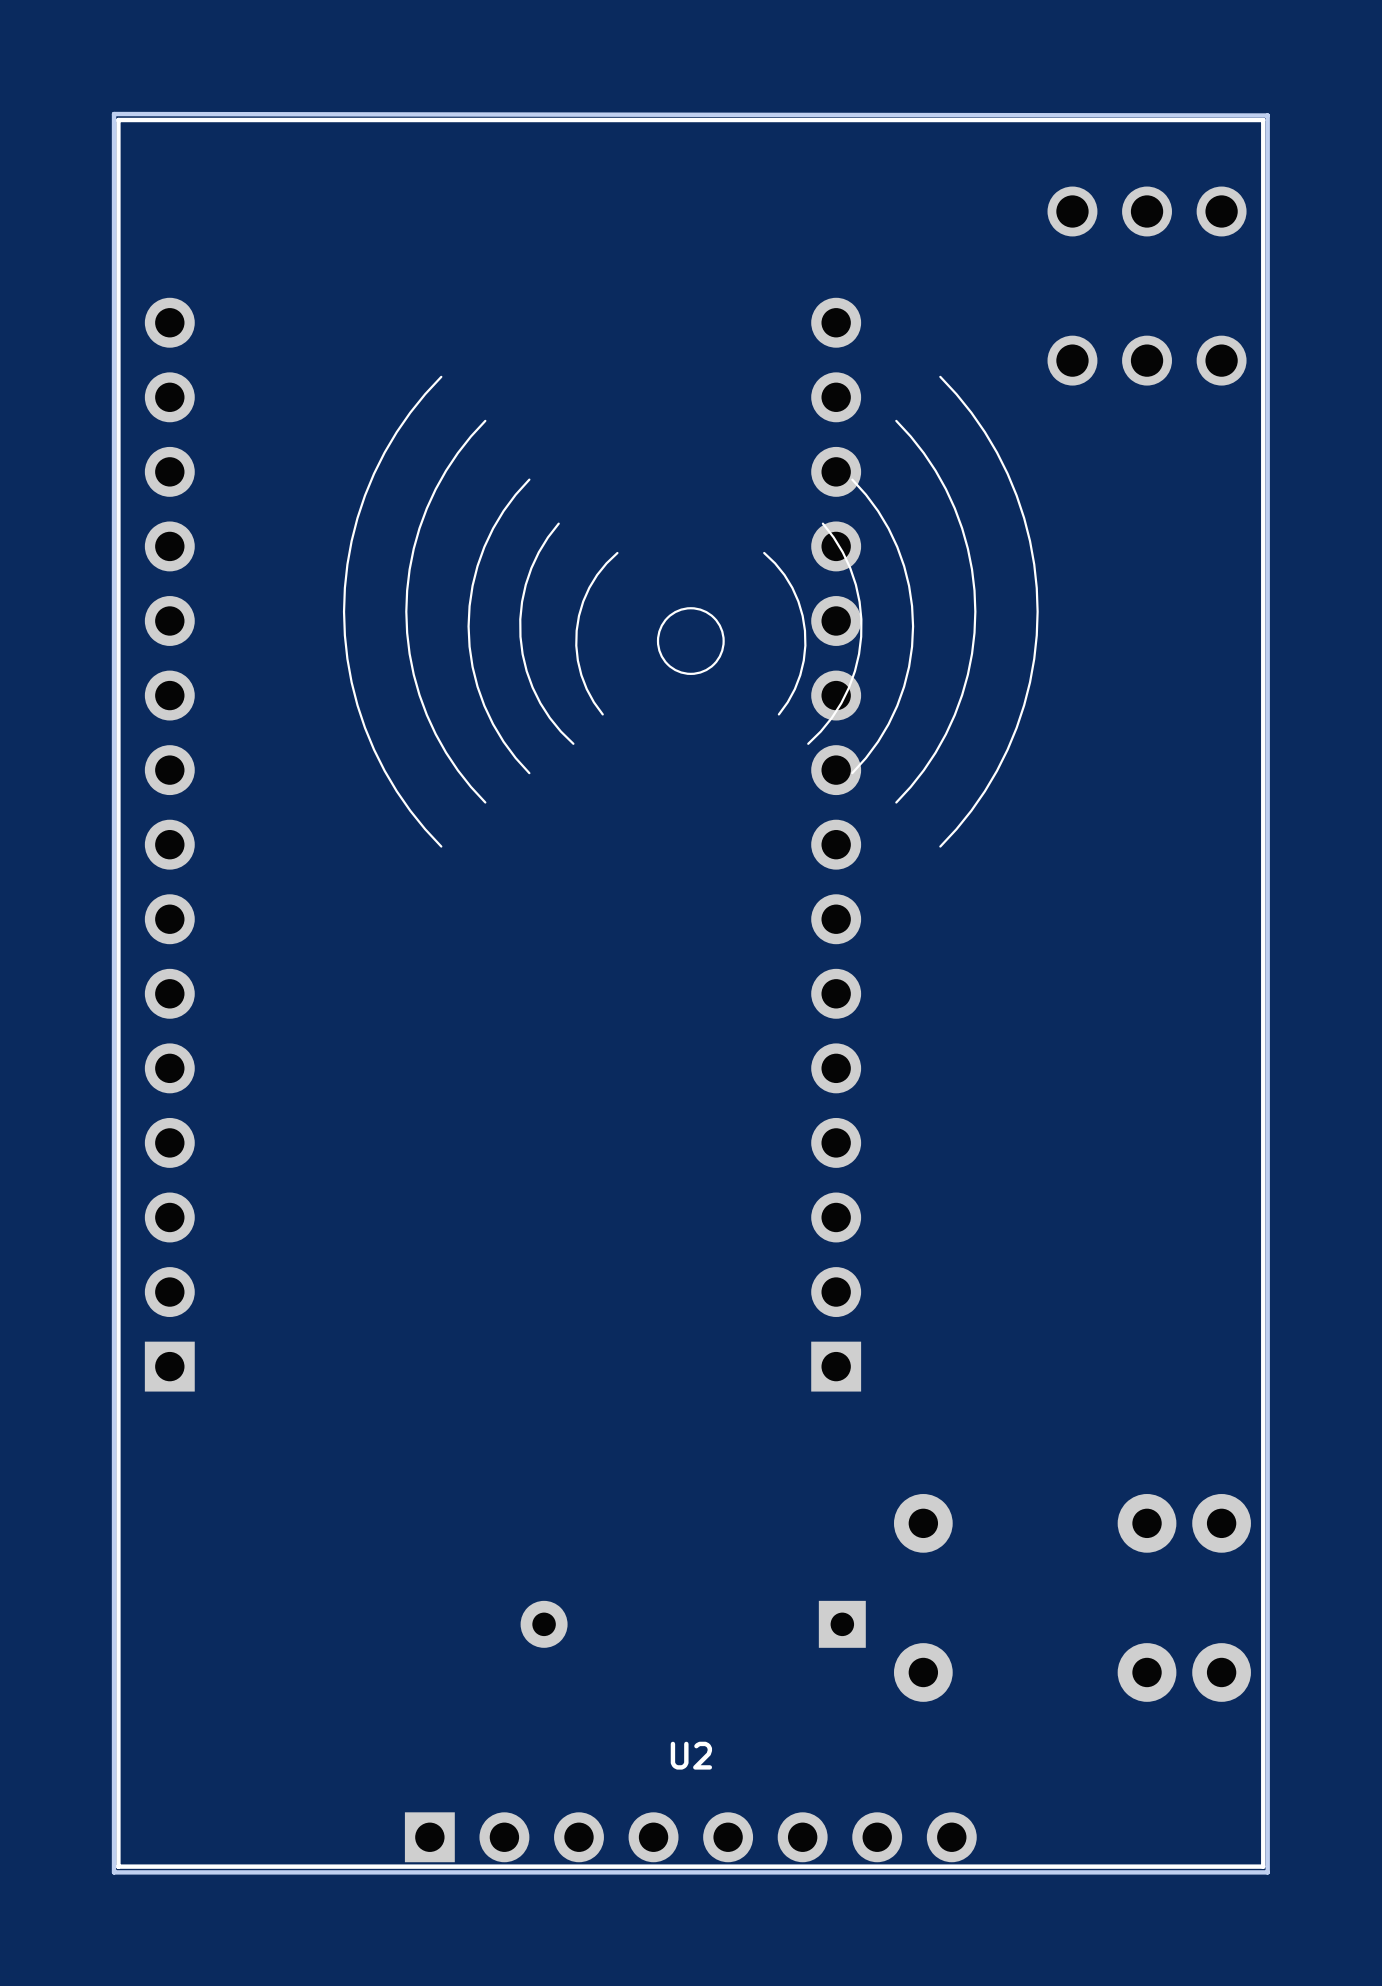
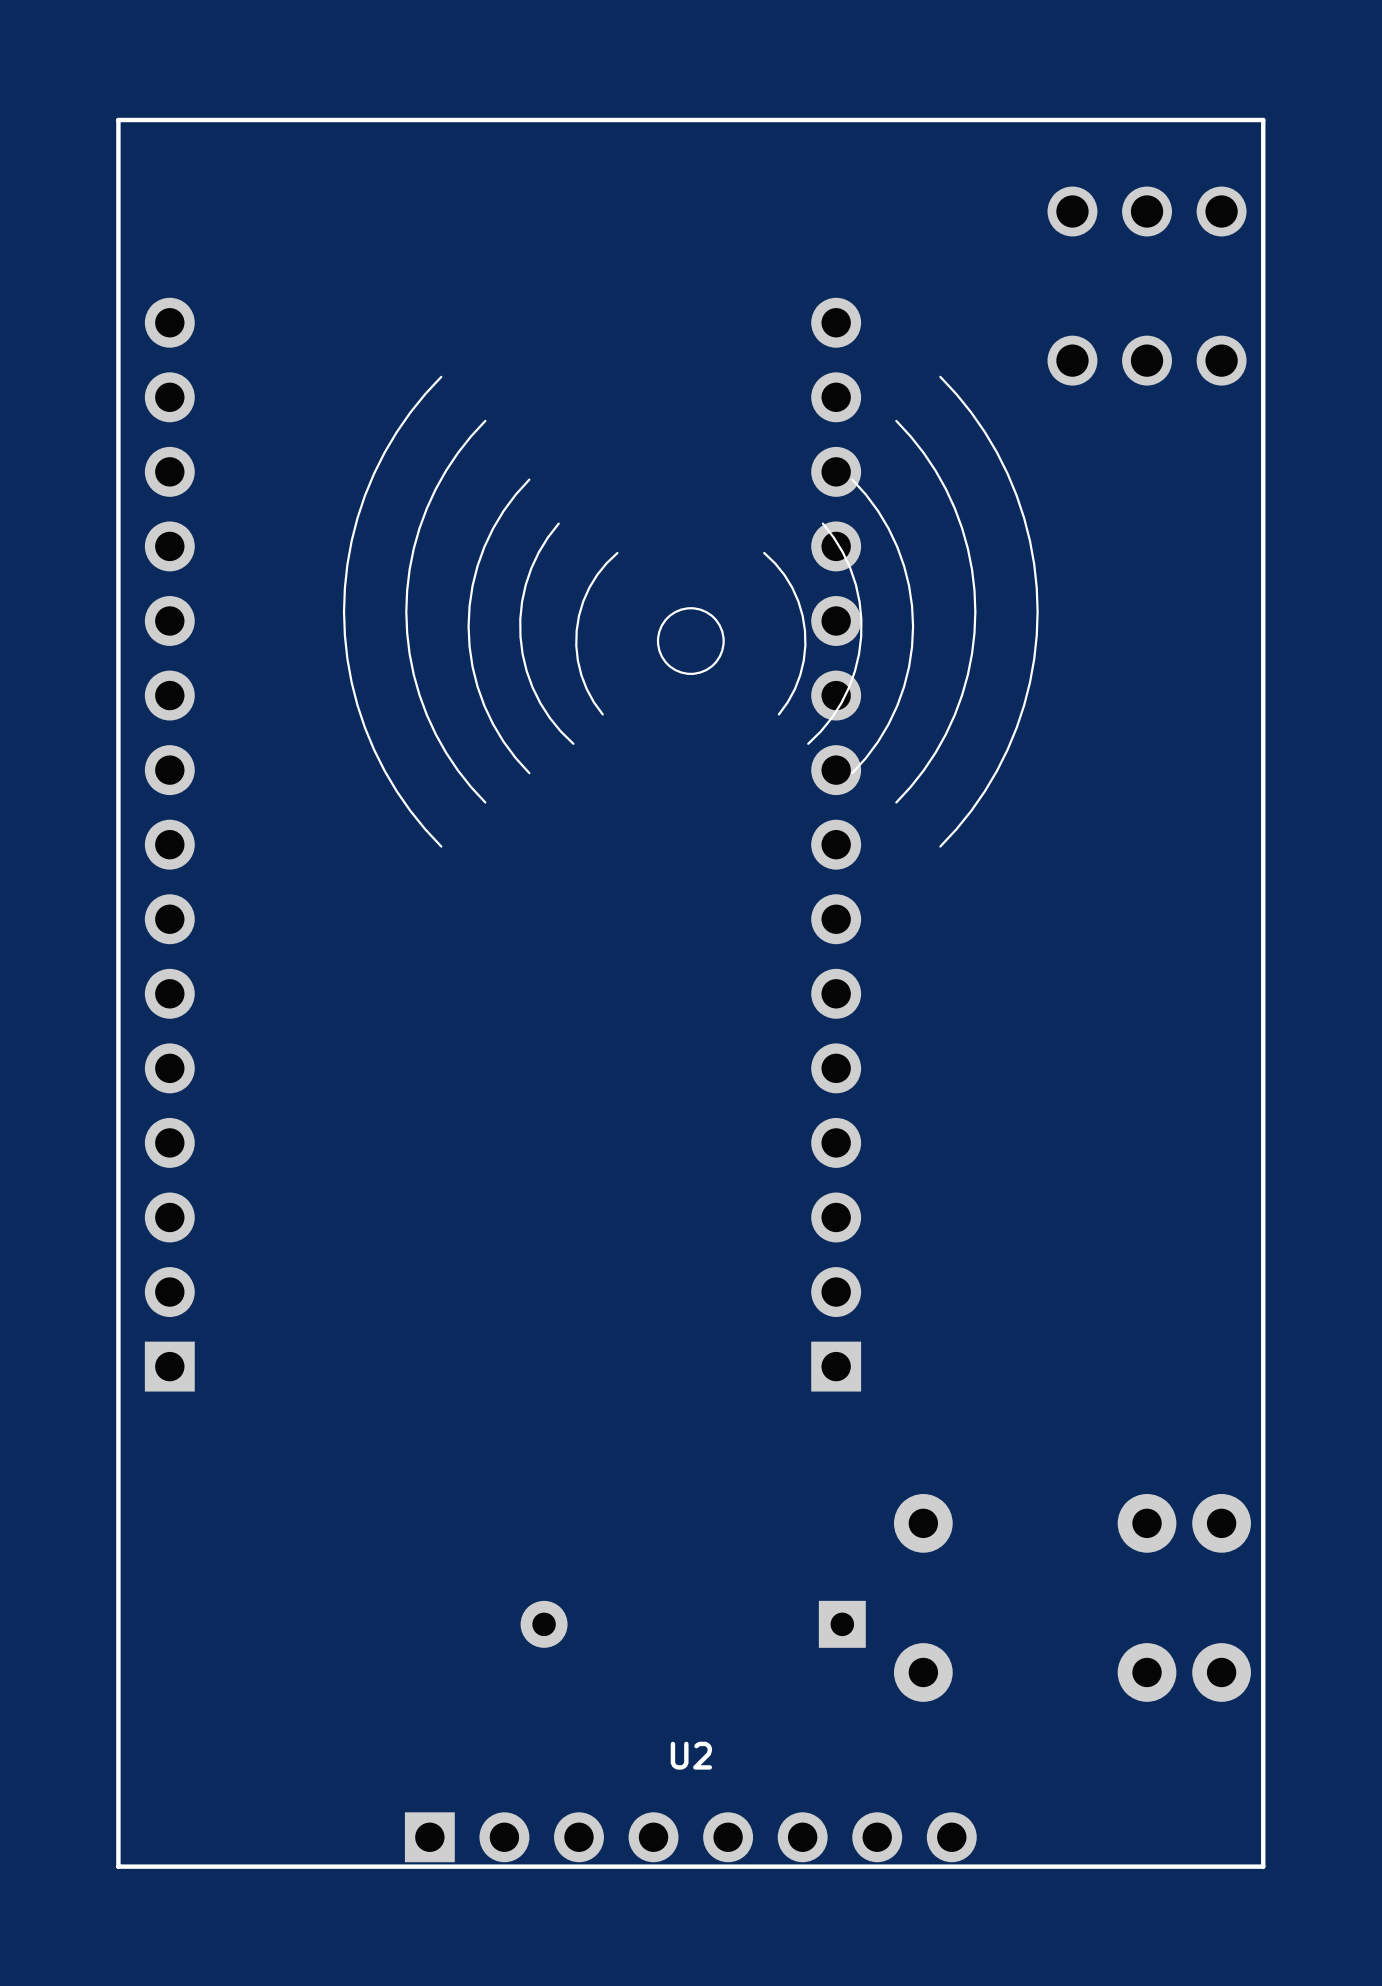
board edge: (114, 114) (1267, 115) (1267, 1872) (114, 1872) (114, 114) -> none

